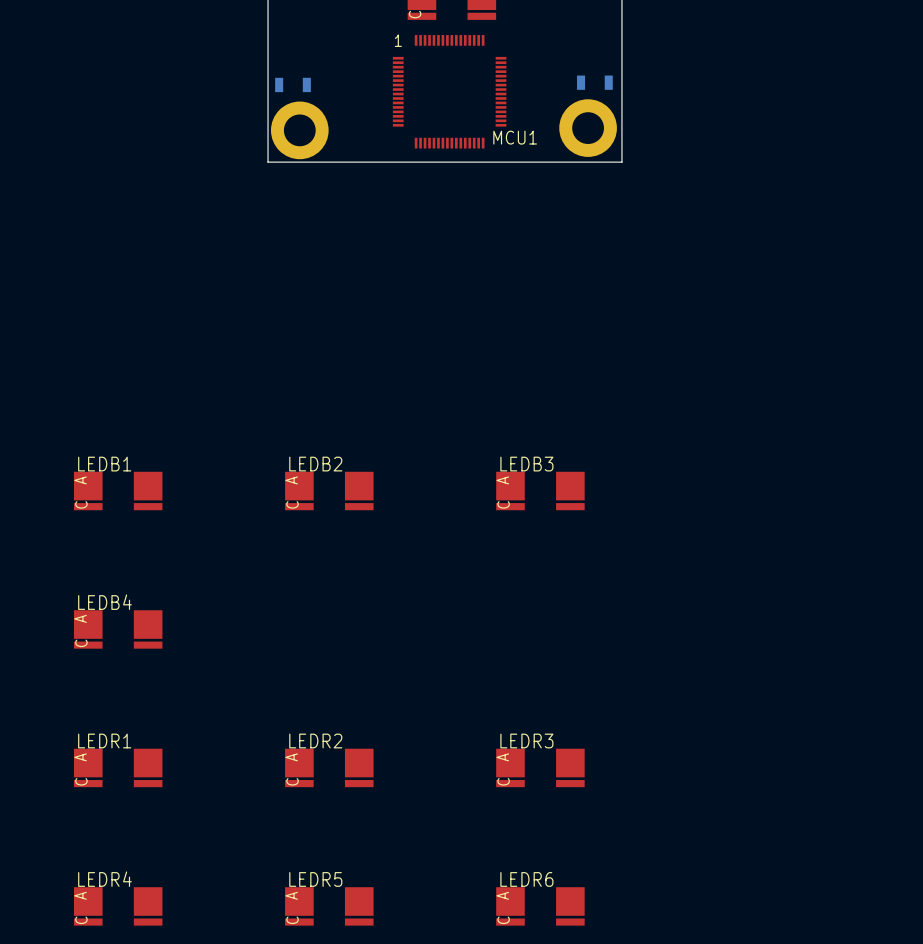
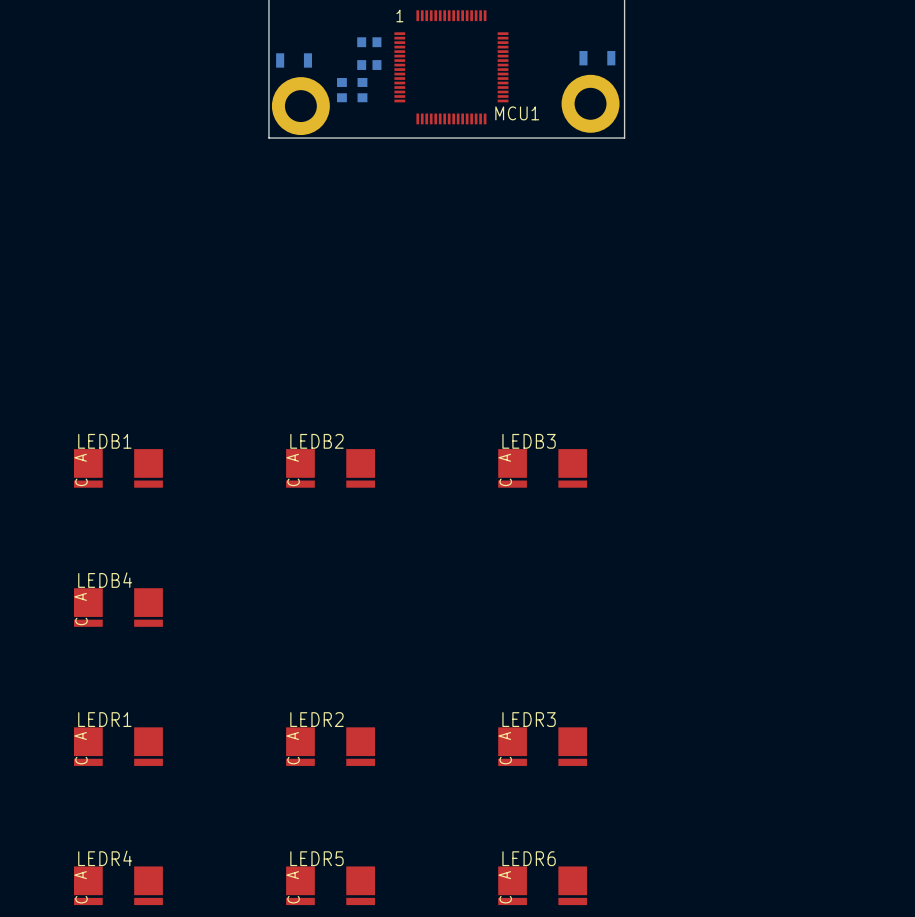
part: none -> (369, 42)
part: none -> (369, 65)
part: none -> (341, 90)
part: none -> (362, 90)

